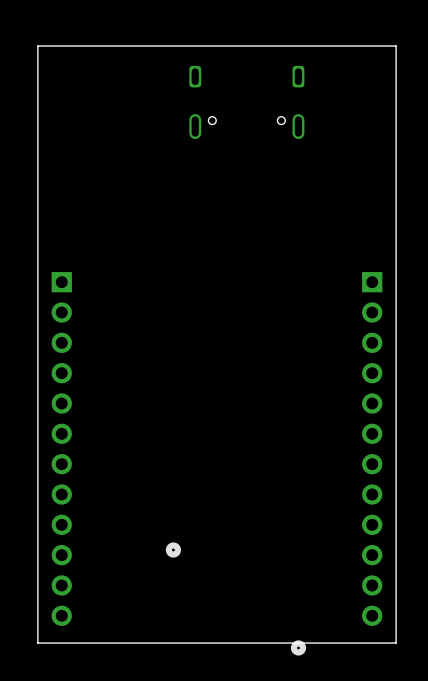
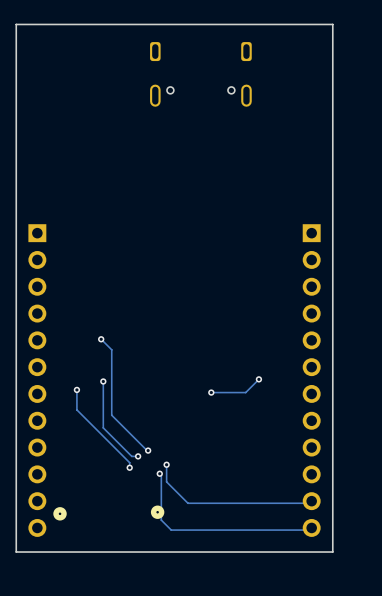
track: none -> (101, 339) (111, 349) (111, 415) (148, 450)
via: none -> (101, 339)
track: none -> (258, 379) (245, 392) (211, 392)
via: none -> (258, 379)
track: none -> (103, 381) (103, 427) (131, 456) (138, 456)
via: none -> (103, 381)
track: none -> (76, 389) (76, 409) (129, 462) (129, 467)
via: none -> (76, 389)
via: none -> (211, 392)
via: none -> (148, 450)
via: none -> (138, 456)
track: none -> (166, 464) (166, 481) (187, 503) (311, 503)
via: none -> (166, 464)
via: none -> (129, 467)
part: (173, 549) -> none
track: none -> (159, 473) (161, 475) (161, 520) (171, 530) (311, 530)
via: none -> (159, 473)
part: none -> (157, 512)
part: none -> (60, 513)
part: (298, 647) -> none

